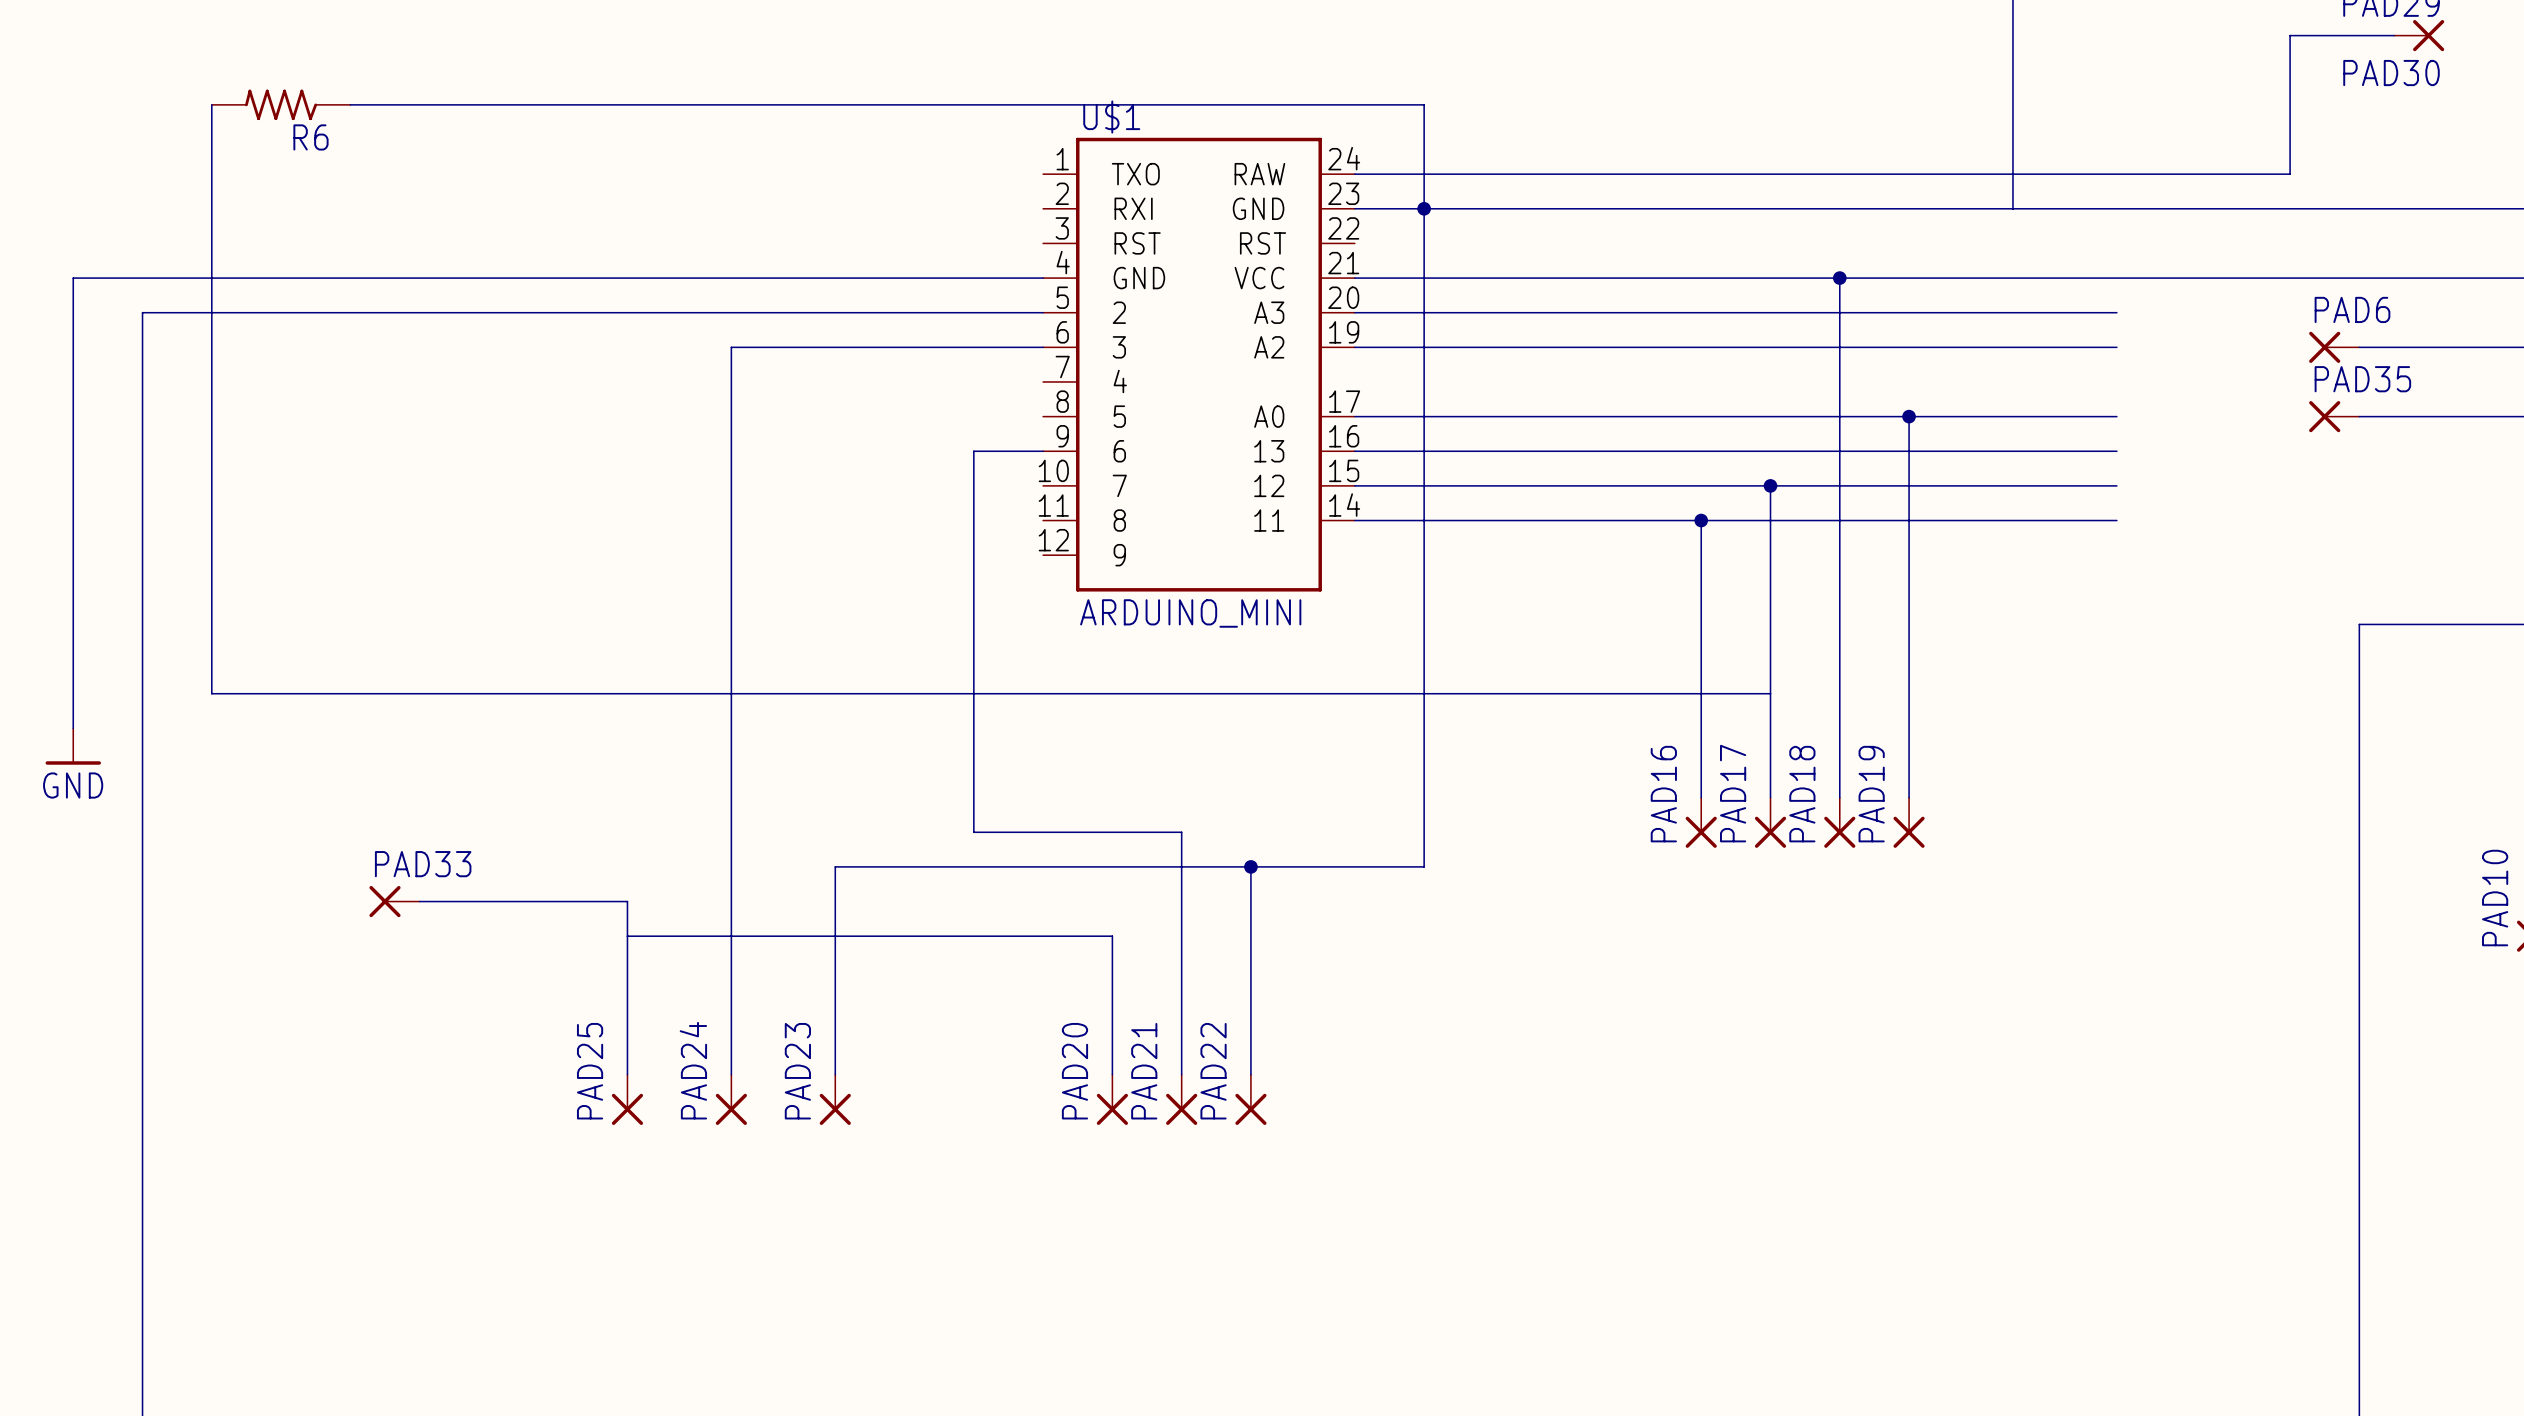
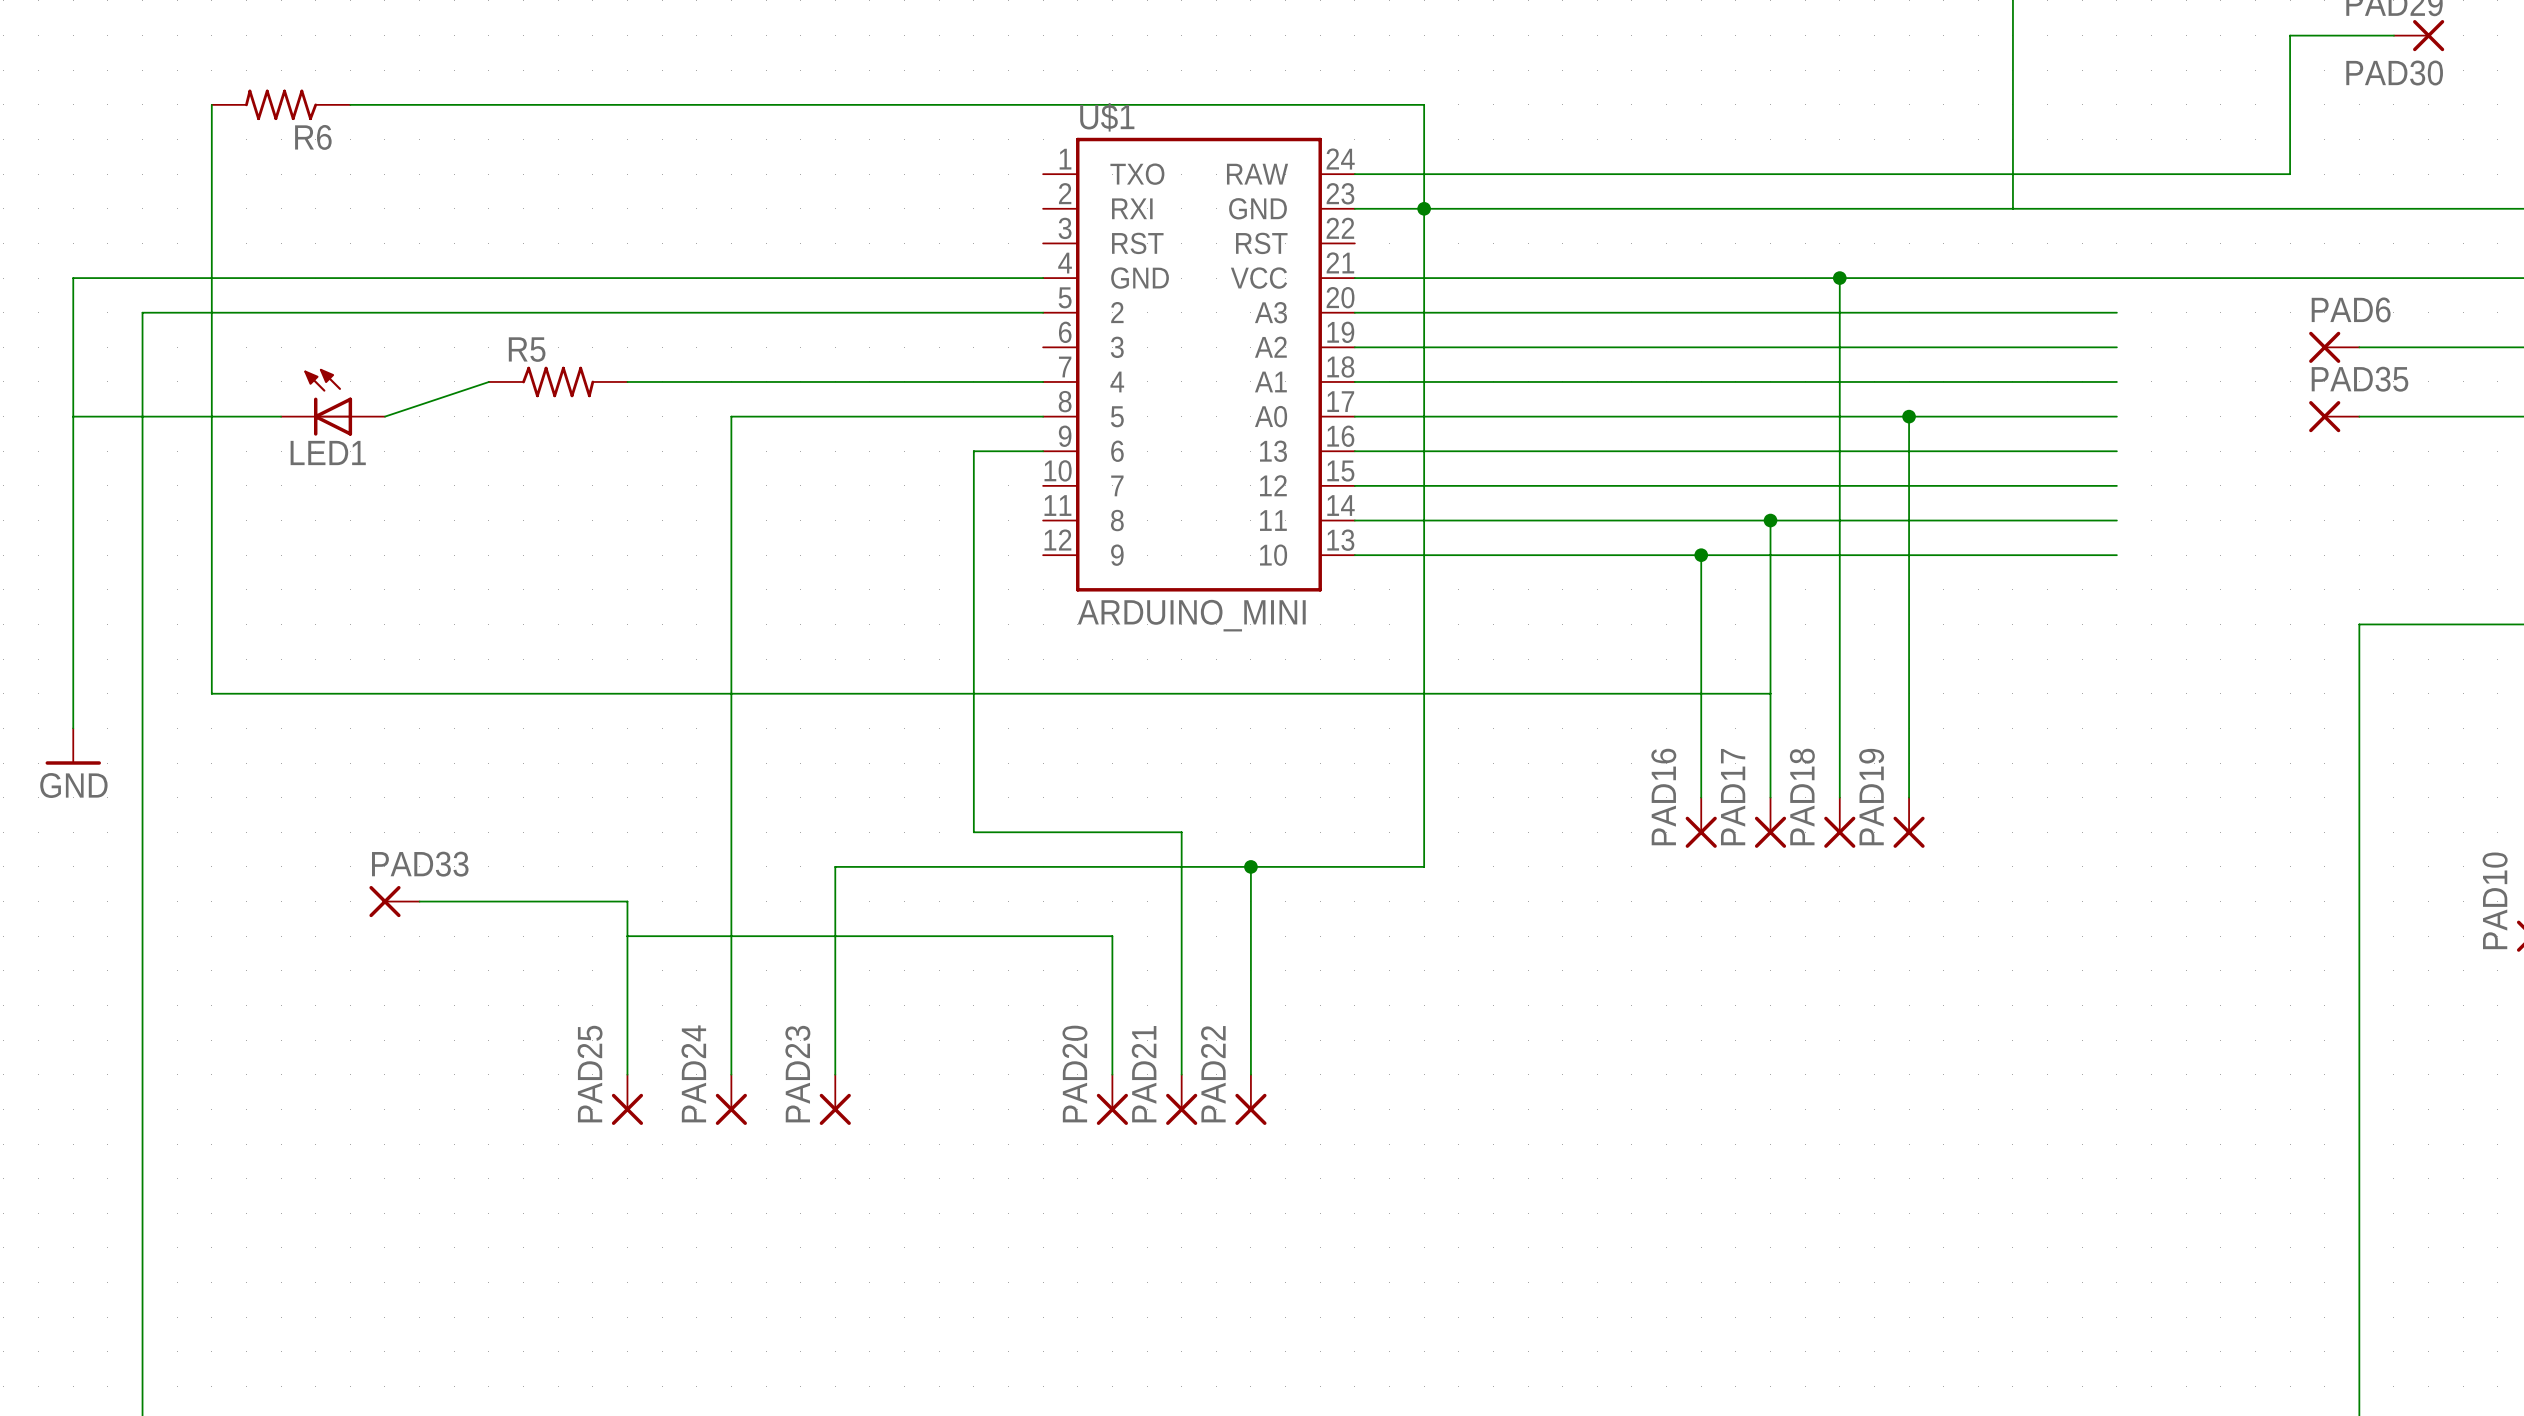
U$1 symbol: [1043, 137, 1355, 592] -> [1043, 137, 1355, 592]
wire: (1043, 347) (731, 347) (731, 416) -> (1043, 416) (731, 416)
wire: none -> (488, 381) (384, 416)
R5: none -> (558, 381)
wire: none -> (627, 381) (1043, 381)
wire: none -> (1354, 381) (2116, 381)
LED1: none -> (333, 402)
wire: none -> (73, 416) (281, 416)
wire: (1770, 485) (1770, 520) -> none
junction: (1770, 485) -> none
wire: (1701, 520) (1701, 555) -> none
junction: (1701, 520) -> none
junction: none -> (1770, 520)
wire: none -> (1354, 555) (2116, 555)
junction: none -> (1701, 555)

